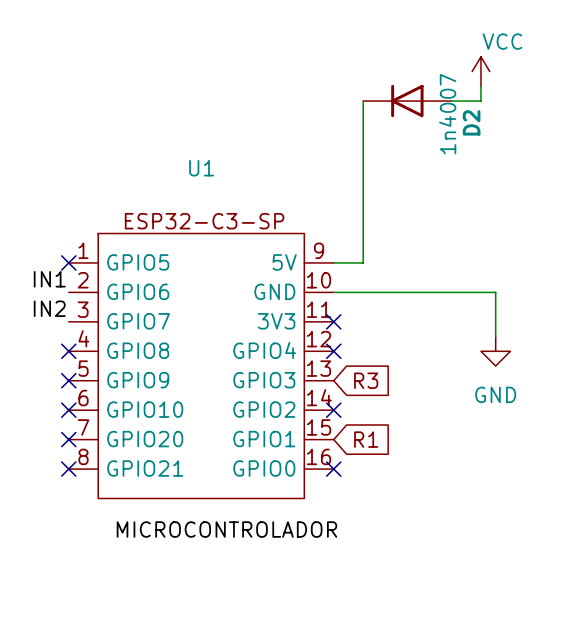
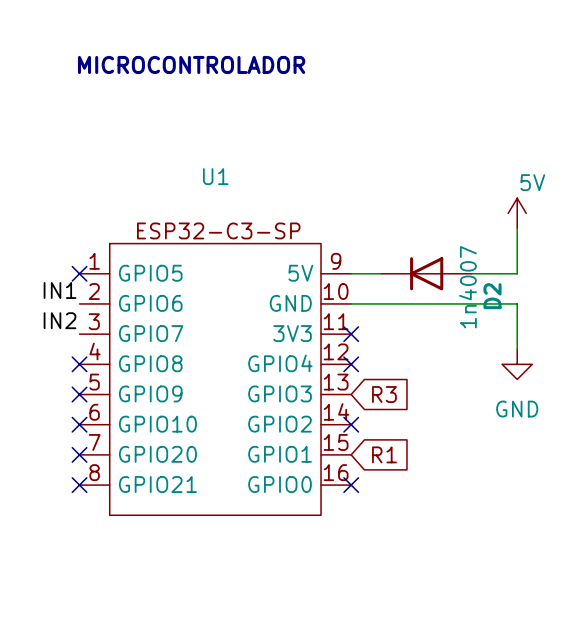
text: none -> MICROCONTROLADOR (191, 64)
power symbol: VCC (480, 71) -> none
wire: (480, 86) (480, 101) (451, 101) -> none
wire: (363, 101) (363, 262) -> none
D2 position: (407, 101) -> (426, 273)
power symbol: none -> 5V (517, 213)
wire: none -> (517, 228) (517, 273) (471, 273)
label: MICROCONTROLADOR (226, 529) -> none

